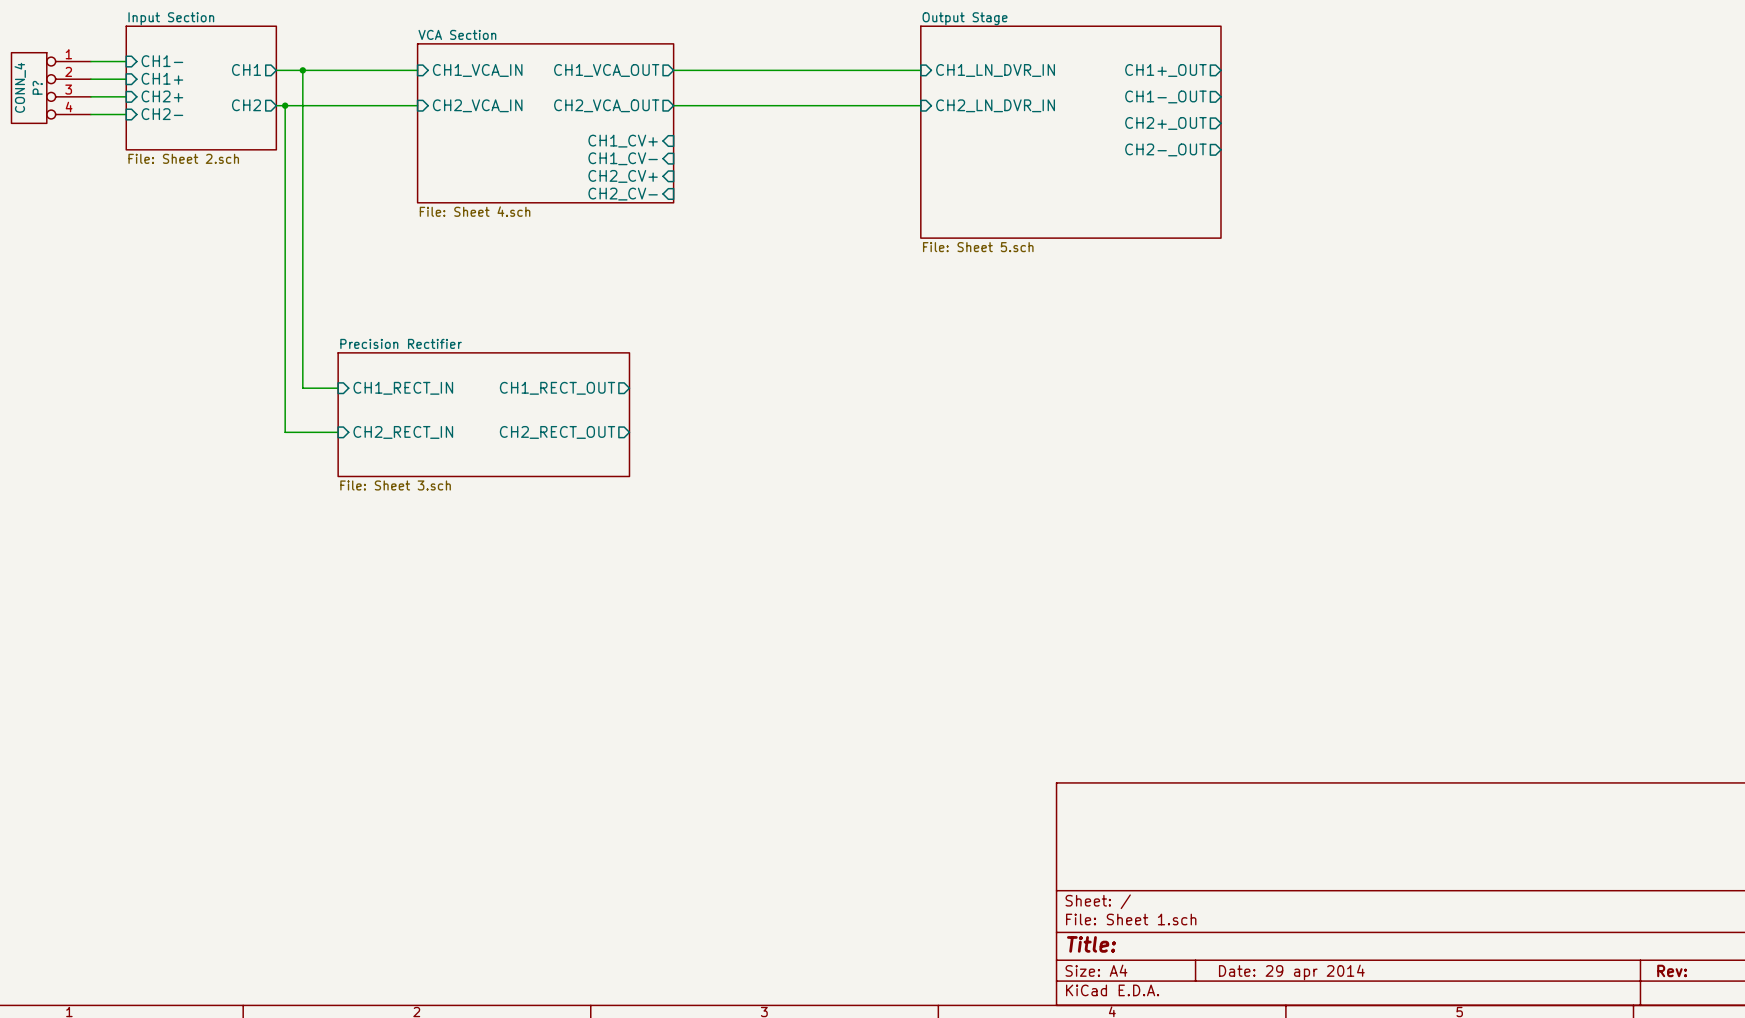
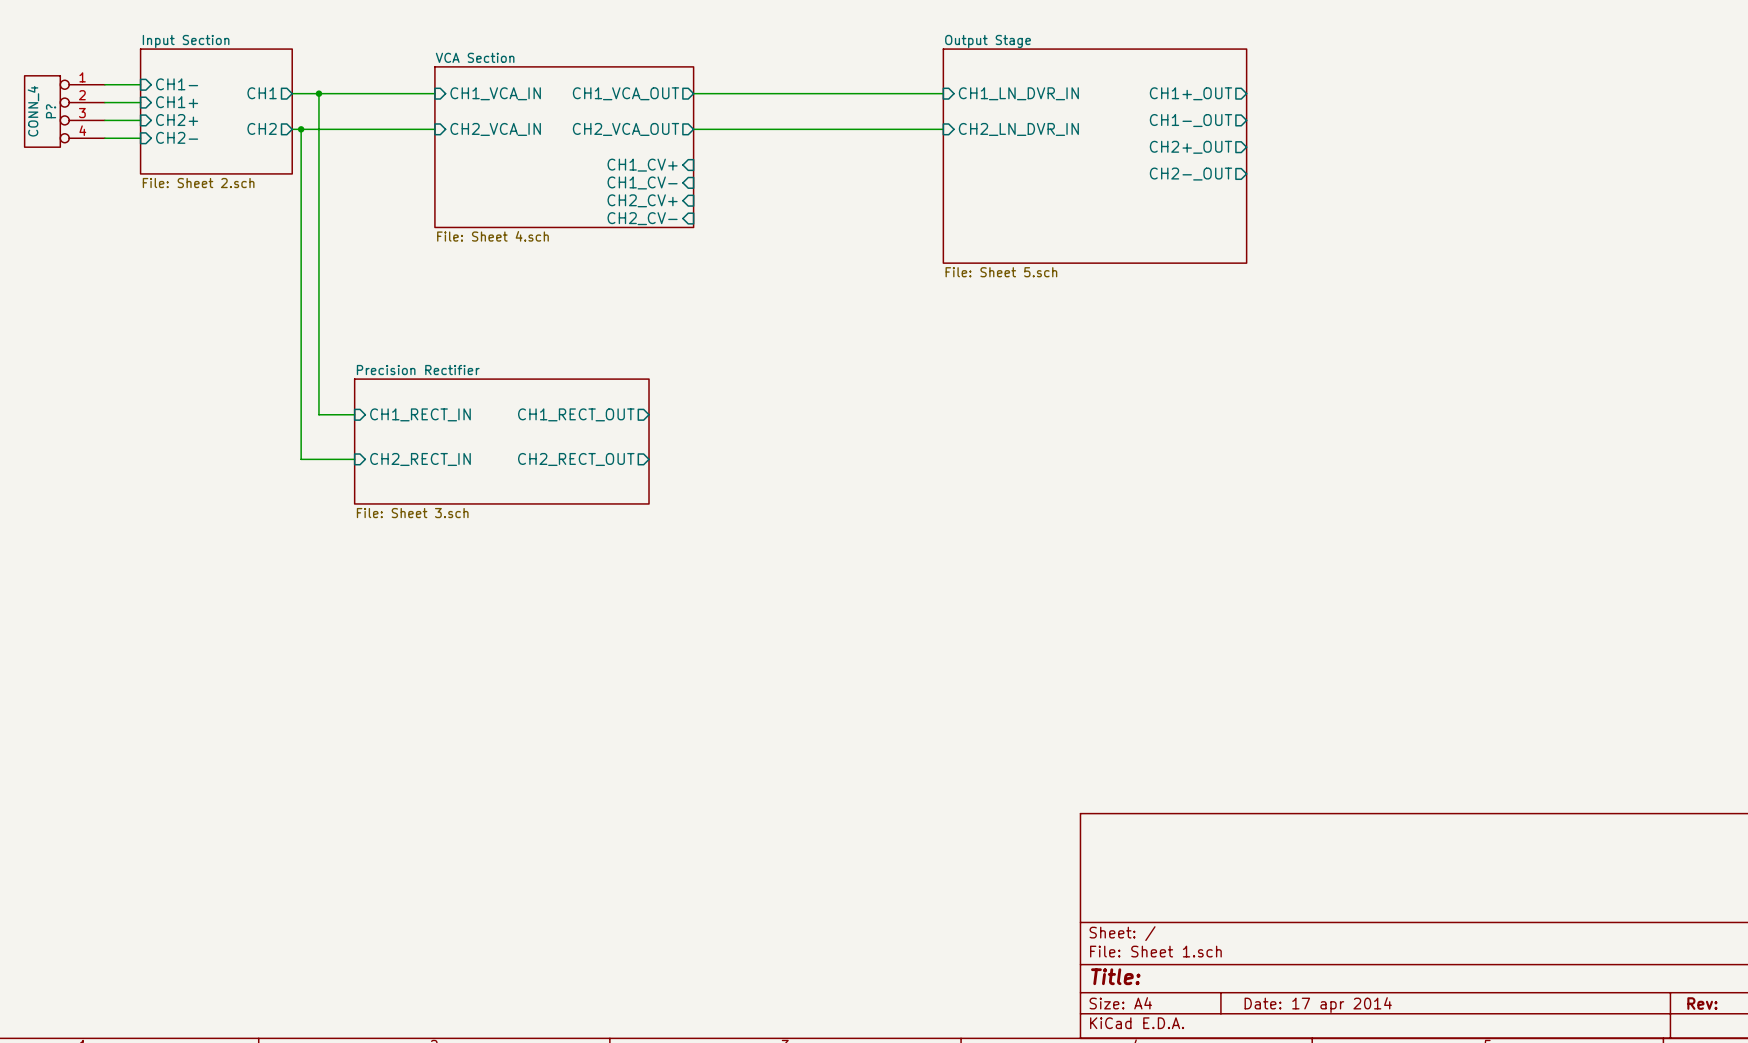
title block: Date: 29 apr 2014 (1291, 972) -> Date: 17 apr 2014 (1318, 1005)

